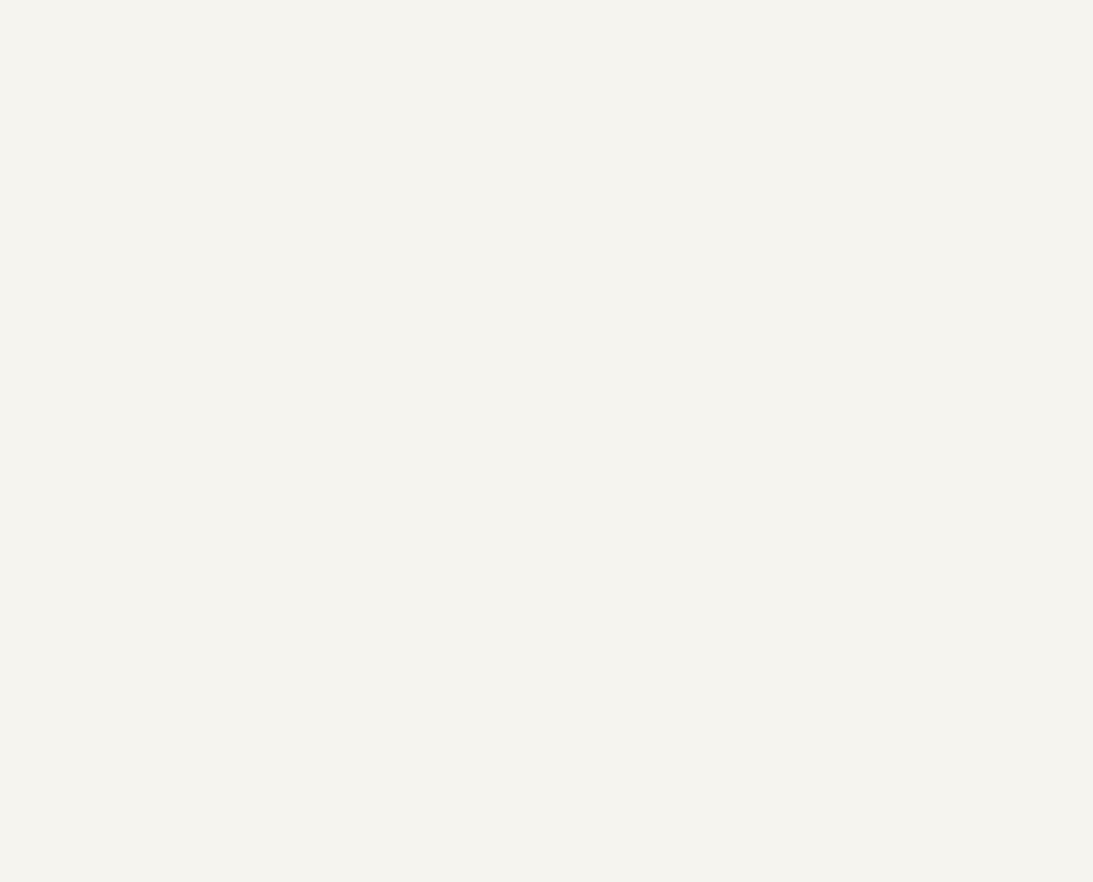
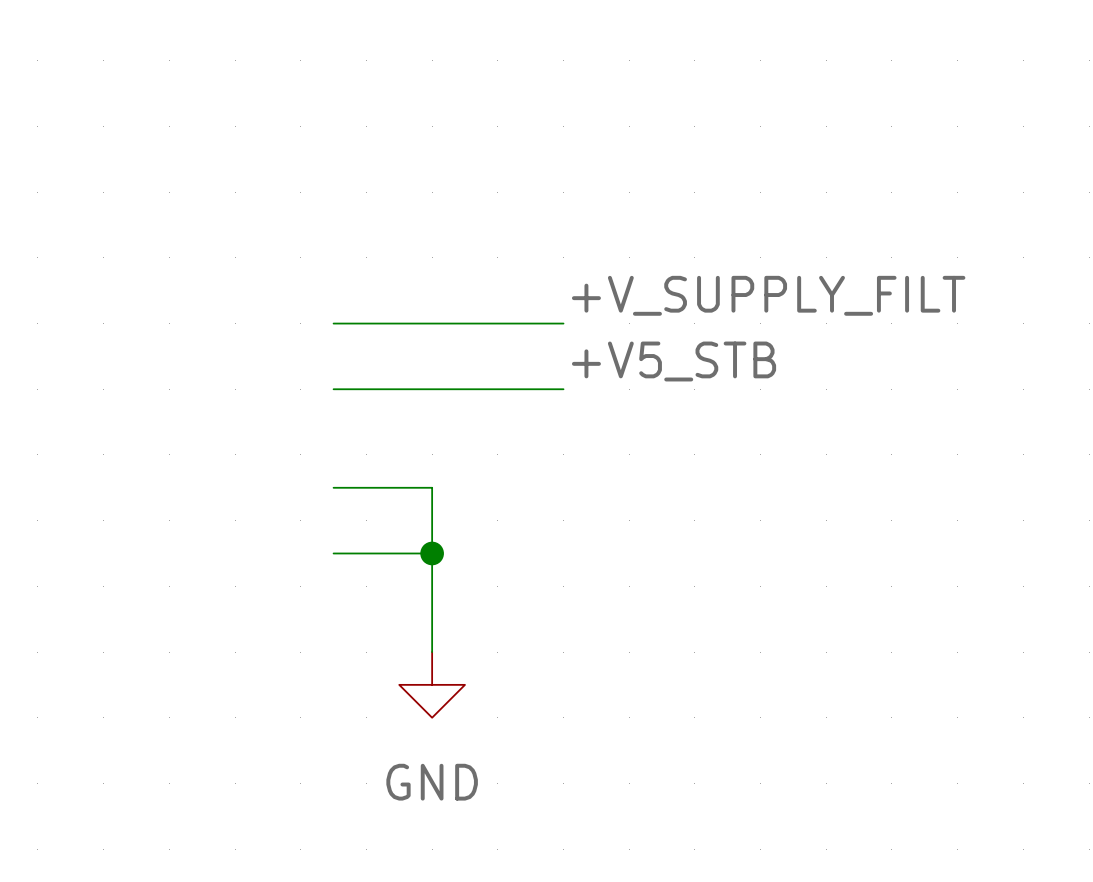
label: none -> +V_SUPPLY_FILT (768, 295)
wire: none -> (333, 323) (563, 323)
label: none -> +V5_STB (674, 361)
wire: none -> (333, 389) (563, 389)
wire: none -> (333, 487) (432, 487) (432, 652)
wire: none -> (333, 553) (432, 553)
junction: none -> (432, 553)
power symbol: none -> GND (432, 684)

